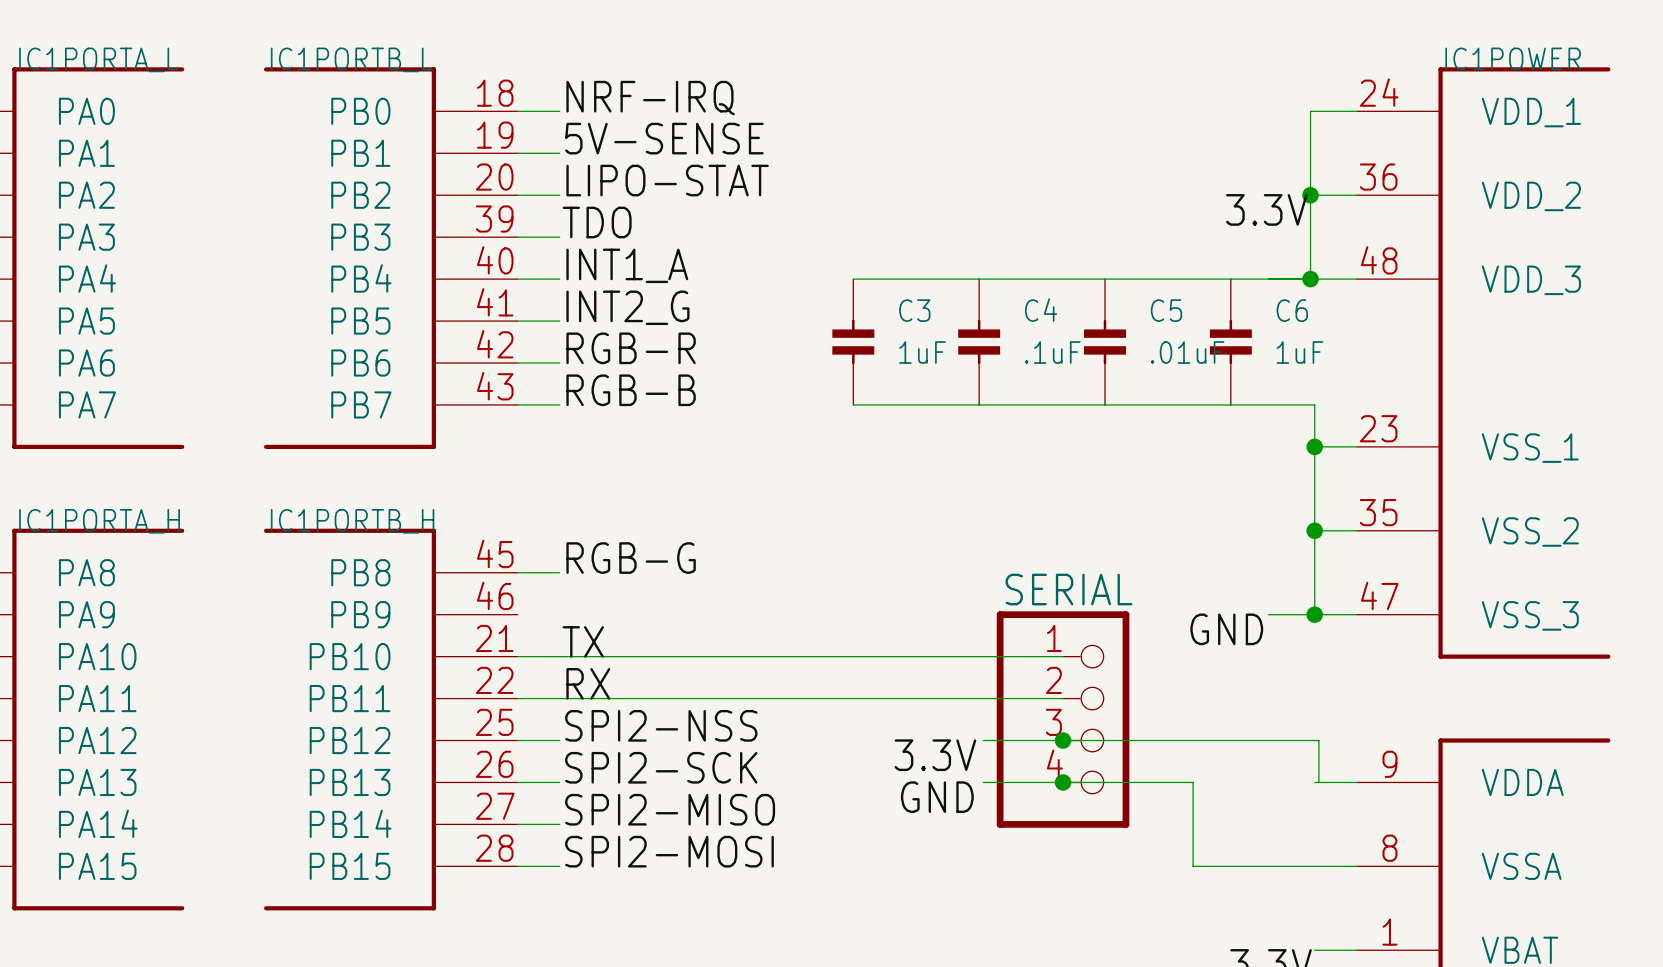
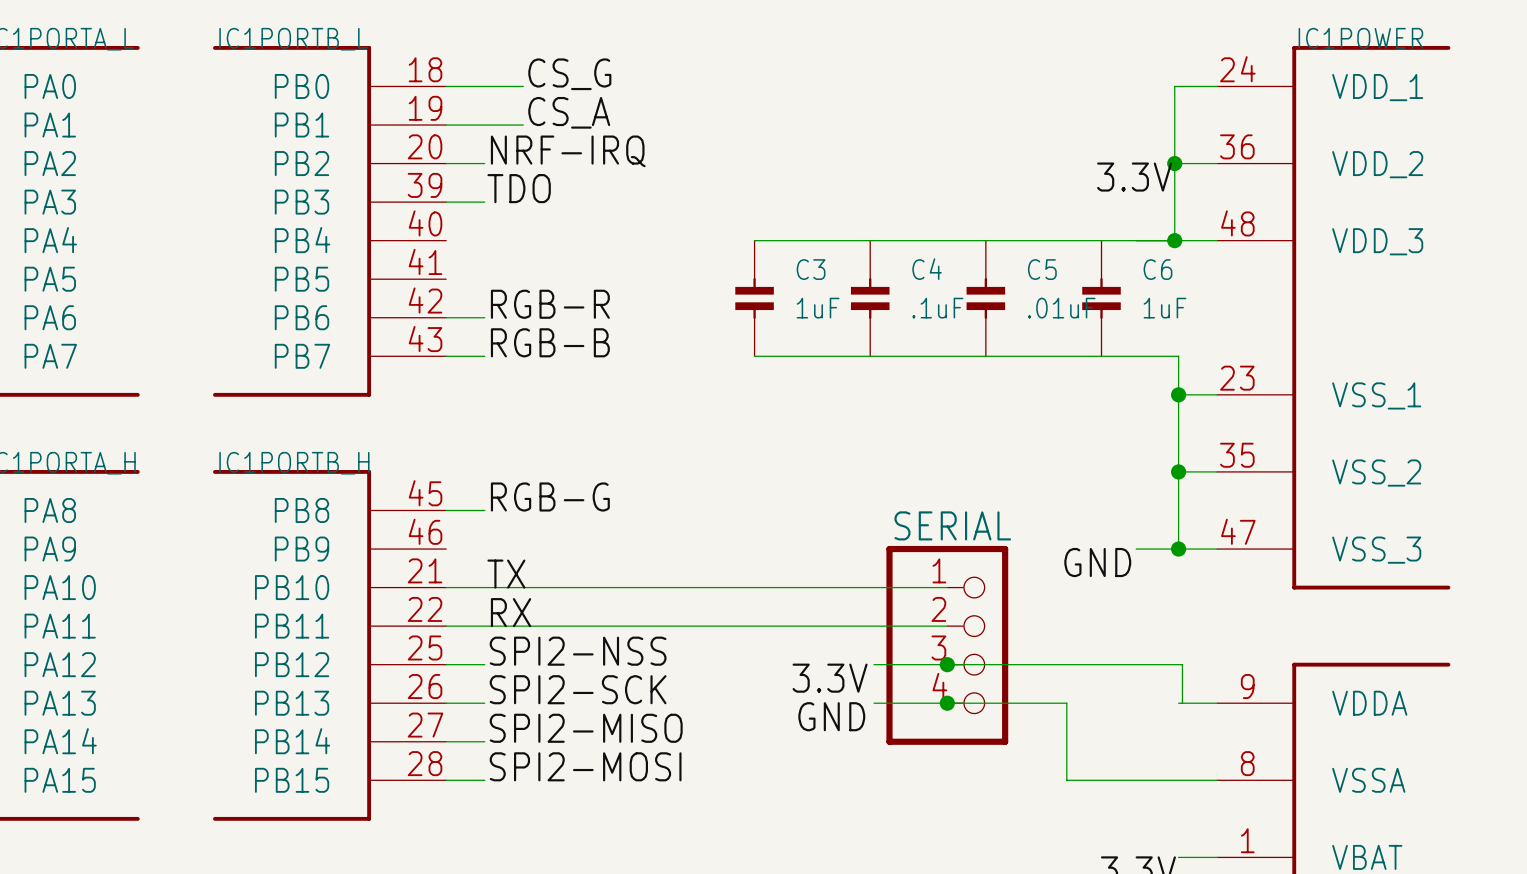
label: NRF-IRQ (650, 98) -> none
label: none -> CS_G (569, 74)
label: 5V-SENSE (664, 138) -> none
label: none -> CS_A (569, 112)
label: LIPO-STAT (667, 180) -> NRF-IRQ (568, 151)
label: INT1_A (627, 265) -> none
wire: (517, 279) (559, 279) -> (484, 125) (523, 125)
label: INT2_G (627, 307) -> none
wire: (517, 321) (559, 321) -> (484, 86) (523, 86)

